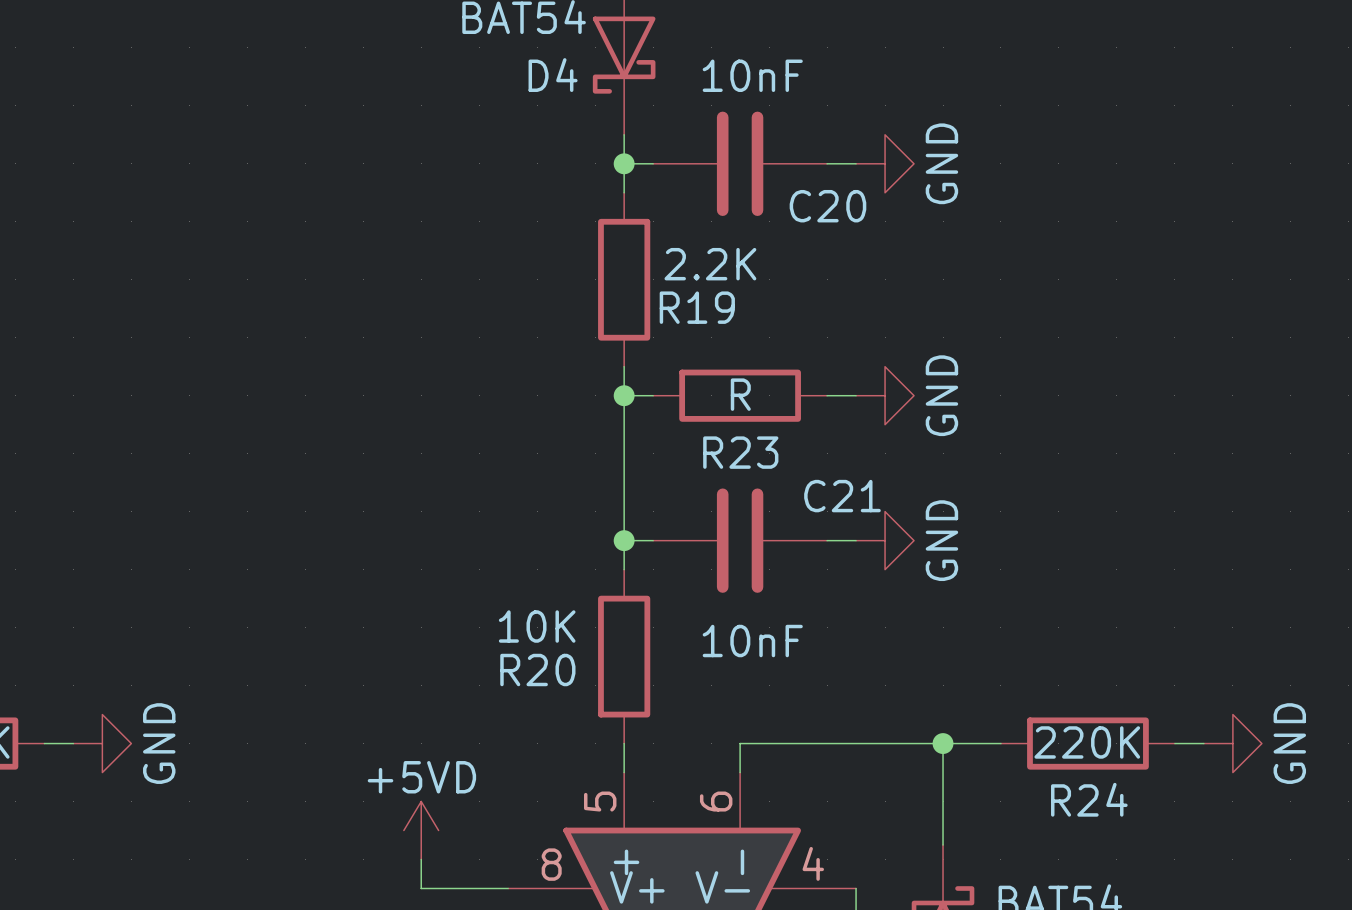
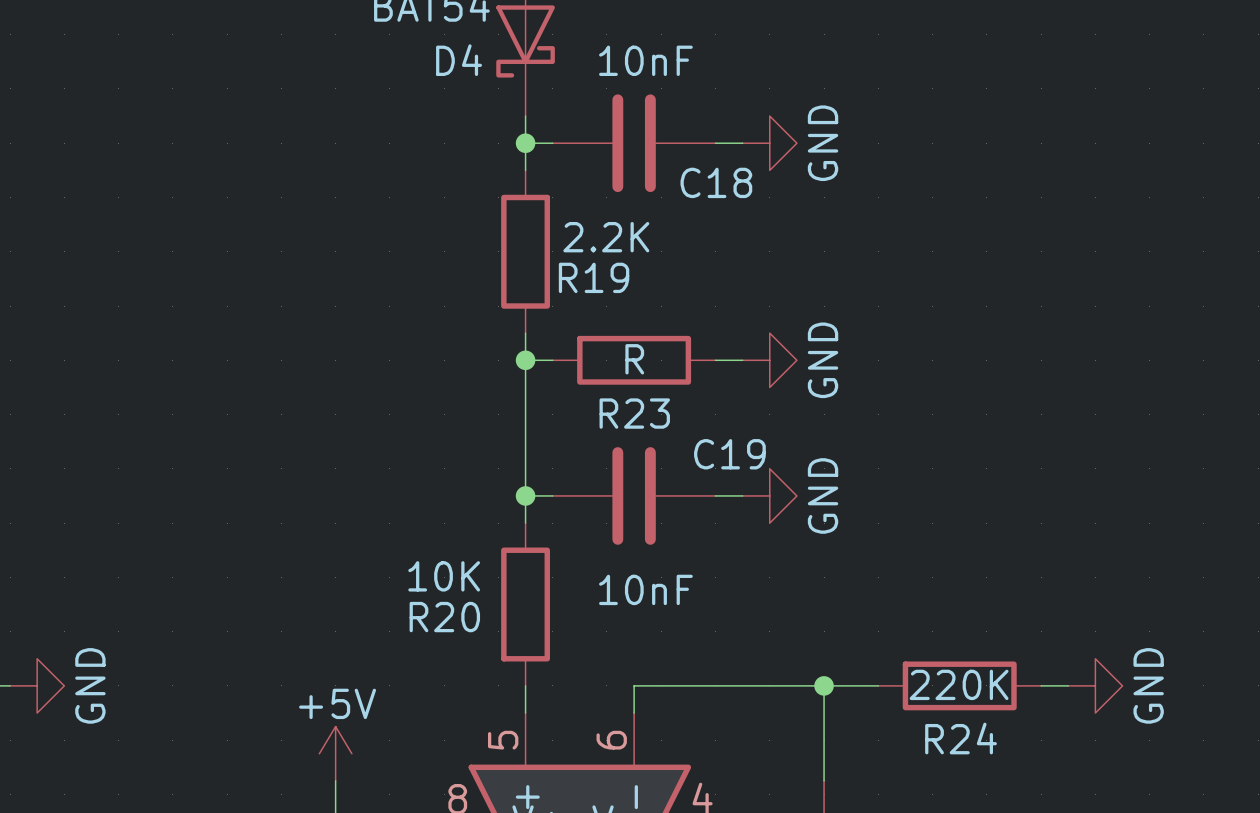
C20 name: C20 (827, 206) -> C18 (716, 182)
C21 name: C21 (842, 496) -> C19 (729, 454)
power symbol: +5VD (421, 830) -> +5V (335, 753)

